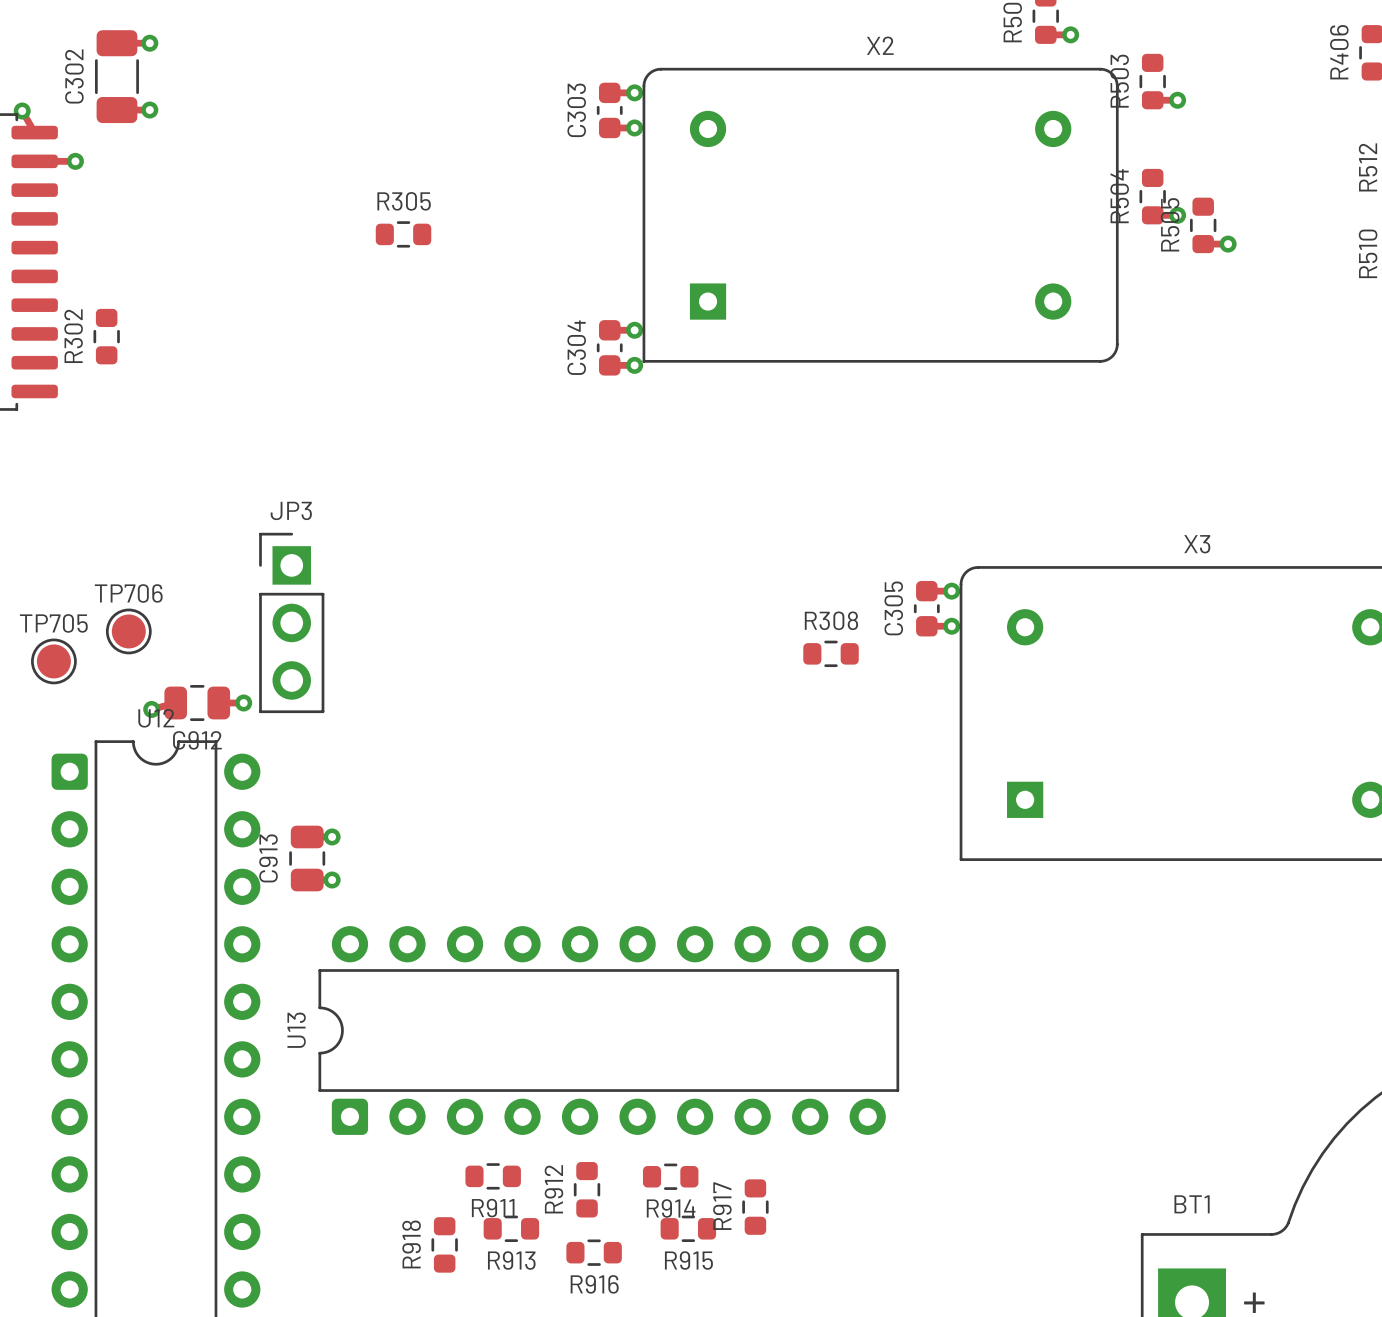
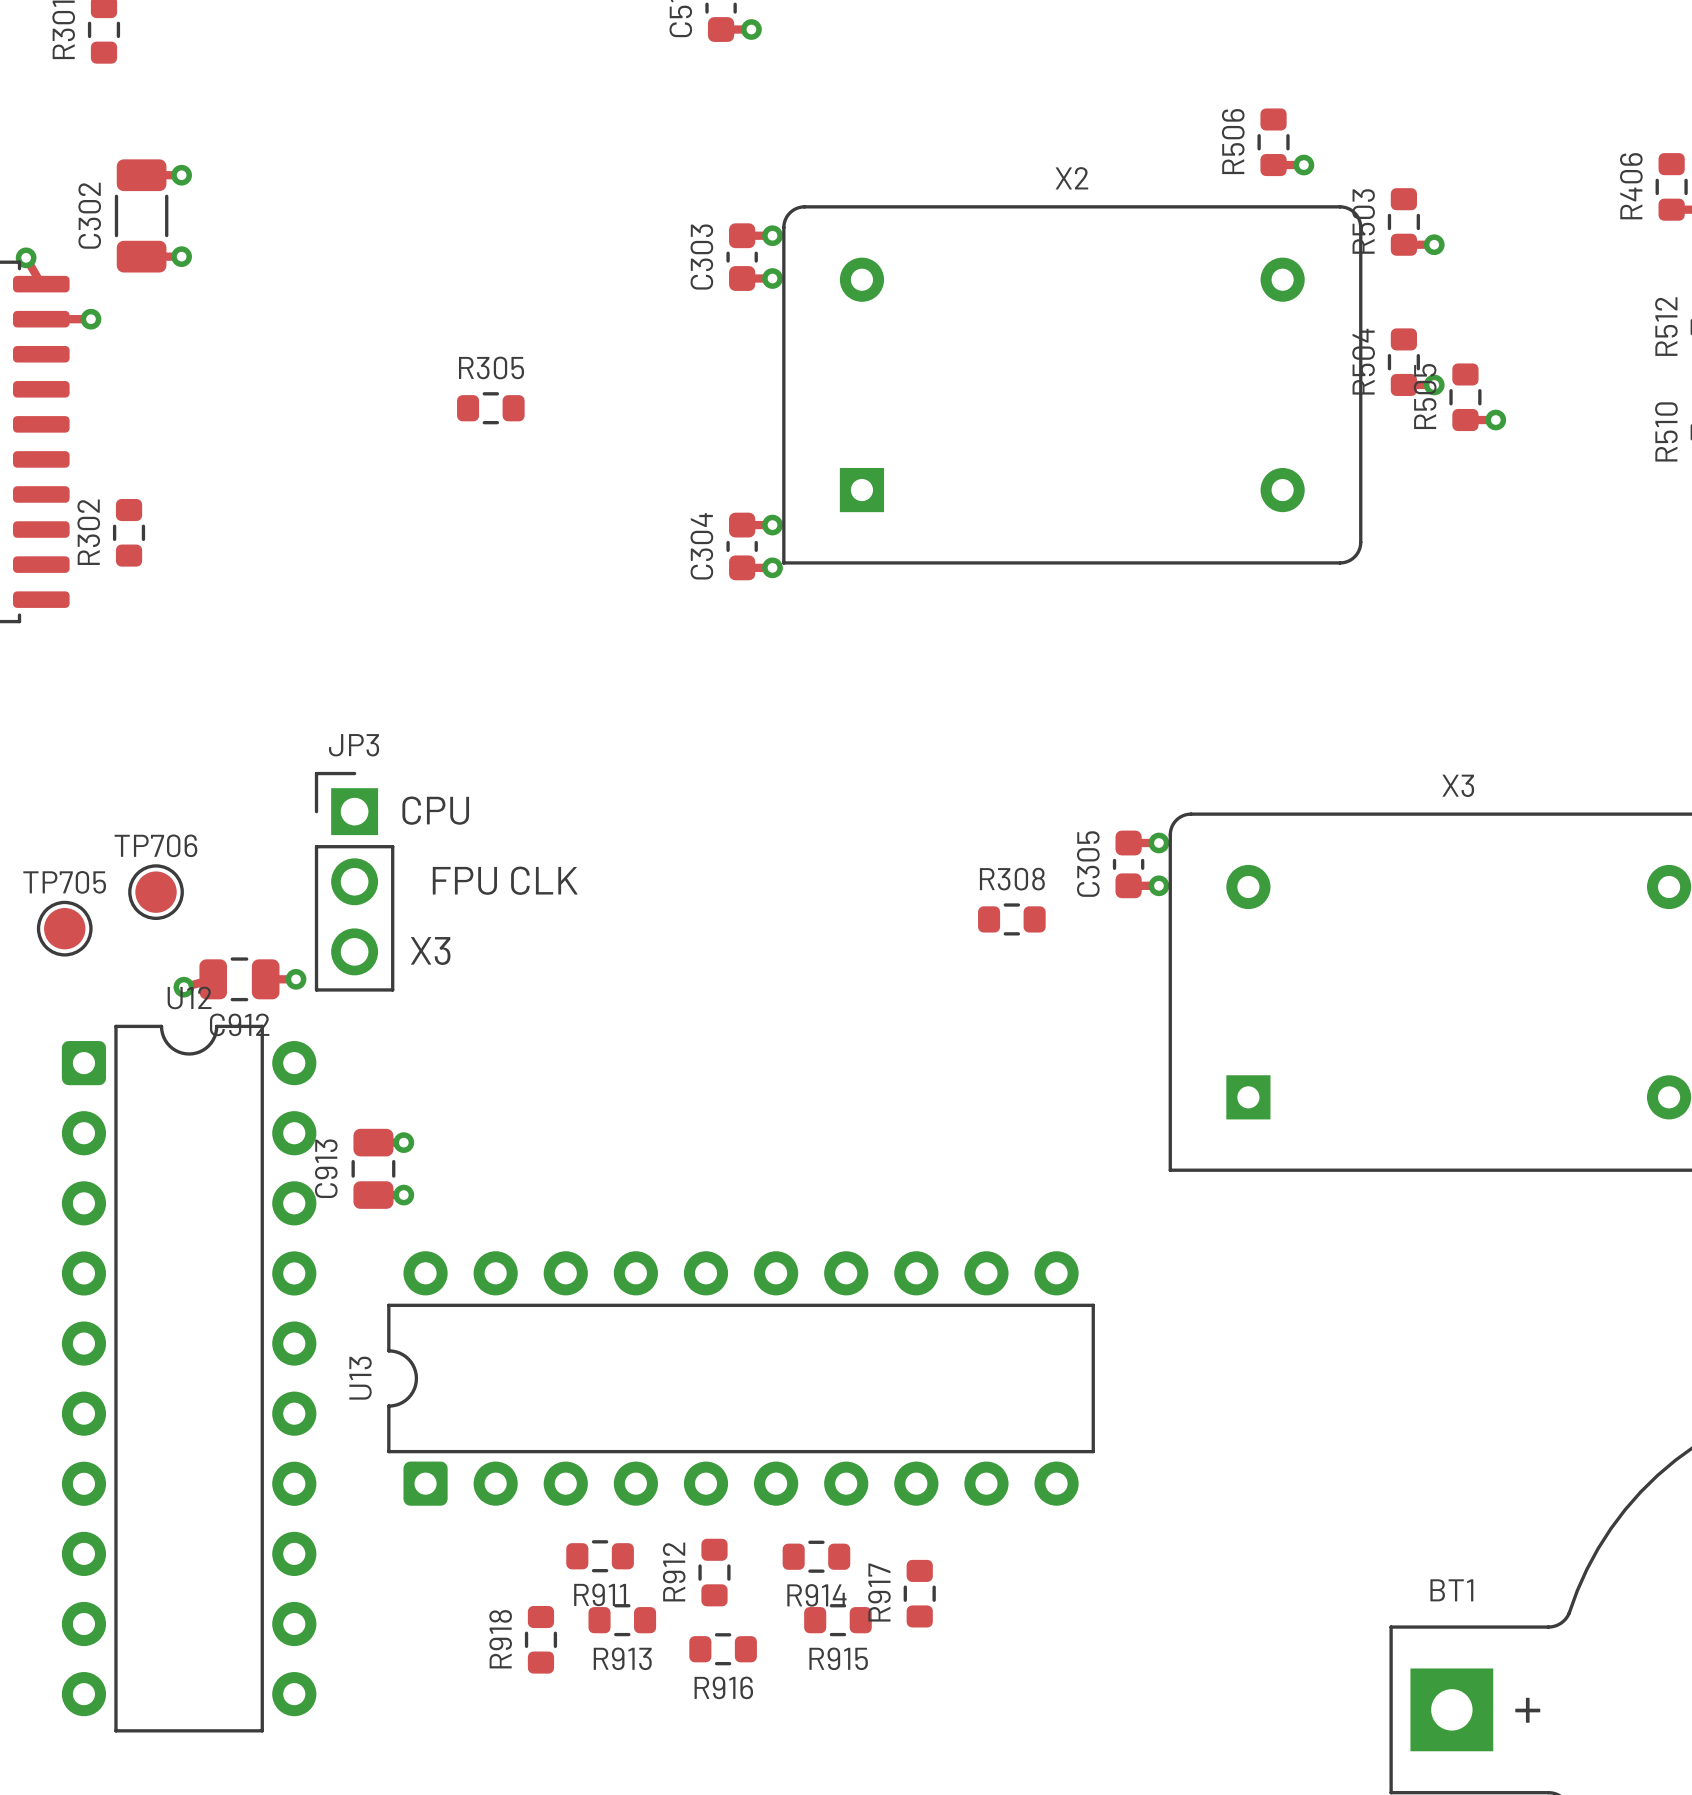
text: none -> CPU (435, 810)
text: none -> FPU CLK (505, 880)
text: none -> X3 (430, 950)

